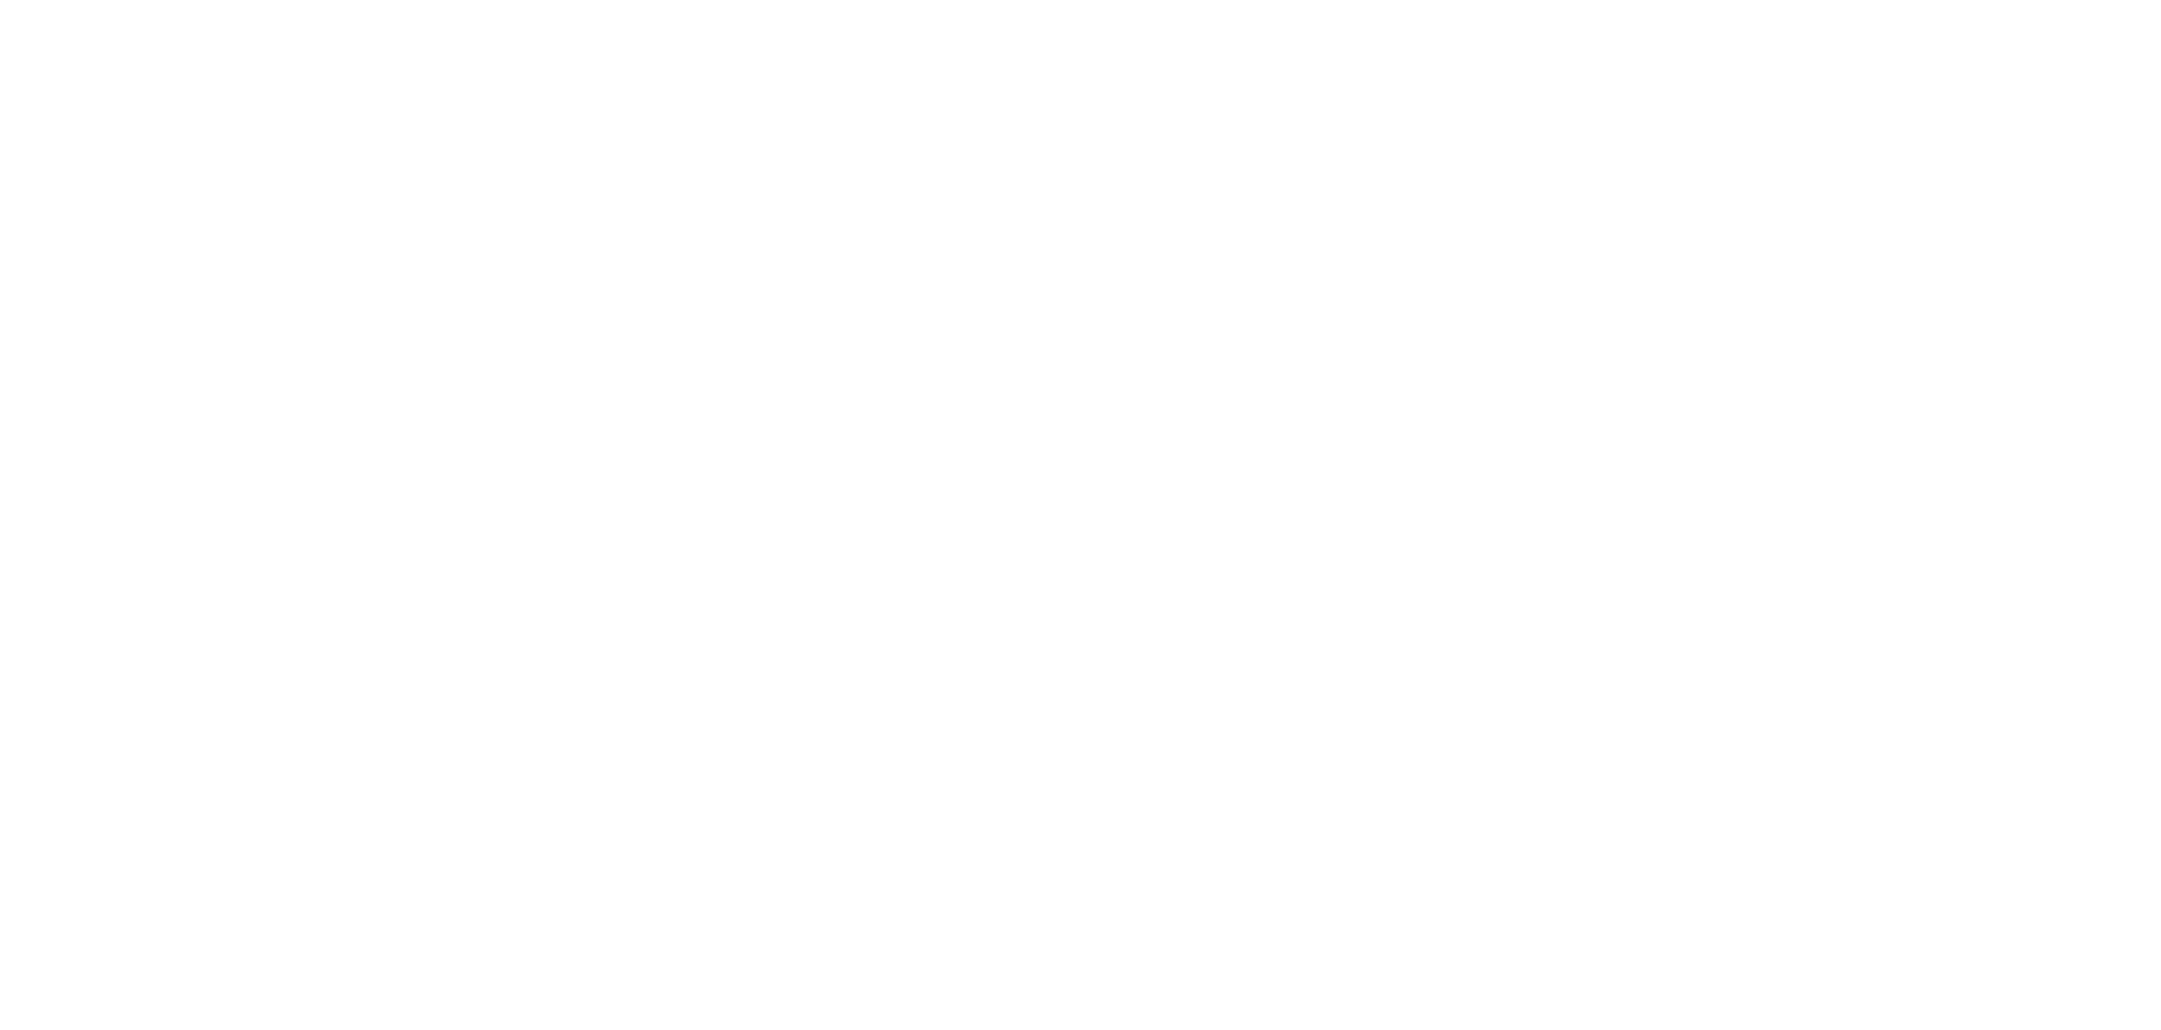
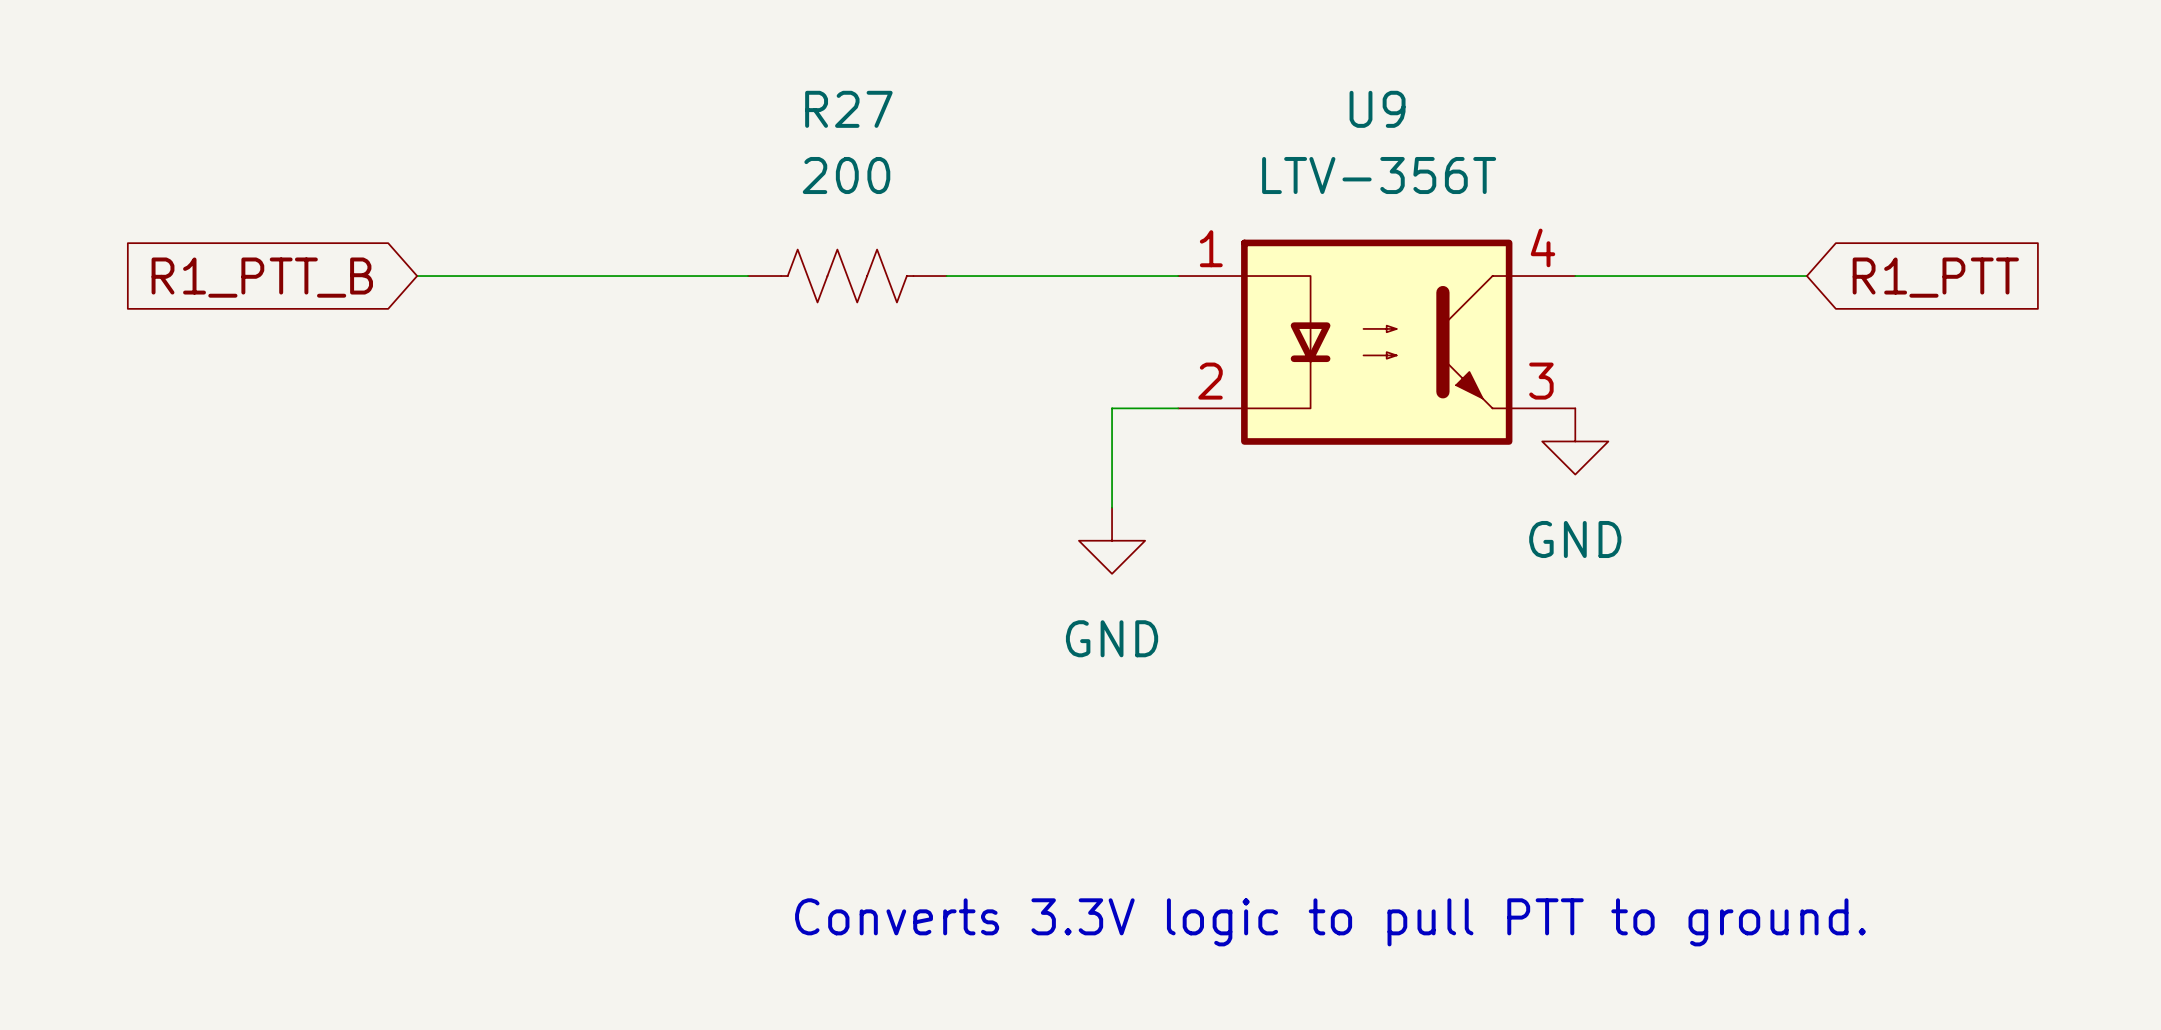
wire: none -> (417, 276) (748, 276)
R27: none -> 200 (847, 276)
wire: none -> (946, 276) (1178, 276)
wire: none -> (1575, 276) (1806, 276)
global label: none -> R1_PTT_B (262, 277)
global label: none -> R1_PTT (1935, 277)
U9: none -> LTV-356T (1376, 342)
wire: none -> (1178, 408) (1112, 408) (1112, 507)
power symbol: none -> GND (1575, 441)
power symbol: none -> GND (1112, 540)
text: none -> Converts 3.3V logic to pull PTT to ground. (1330, 922)

